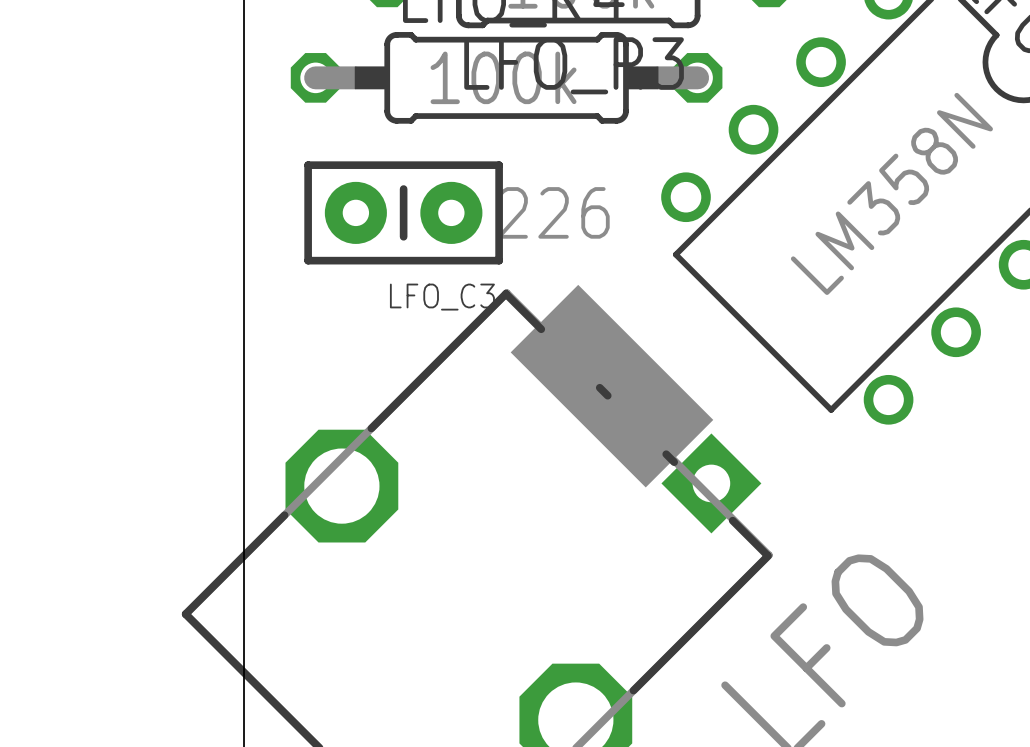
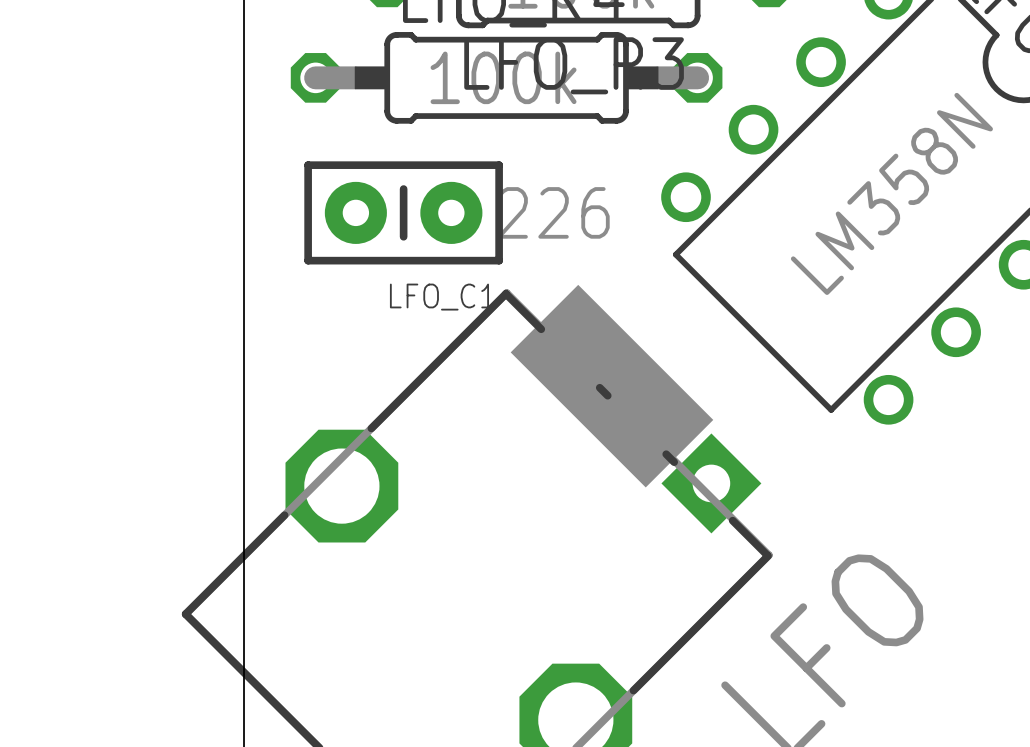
LFO_C3 name: LFO_C3 (442, 297) -> LFO_C1 (442, 297)

